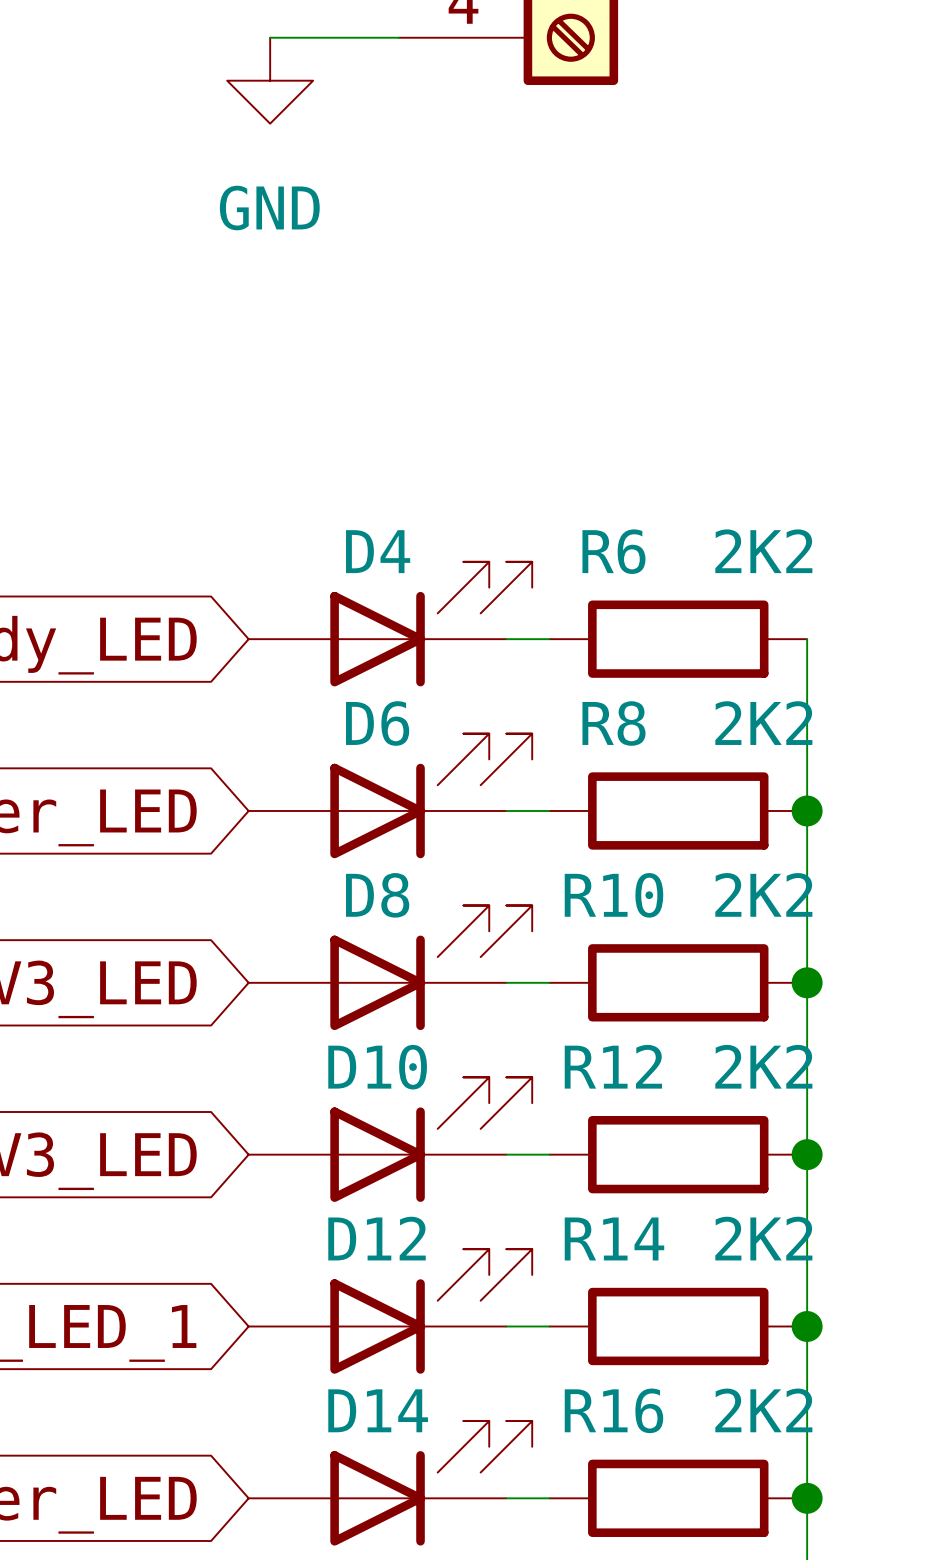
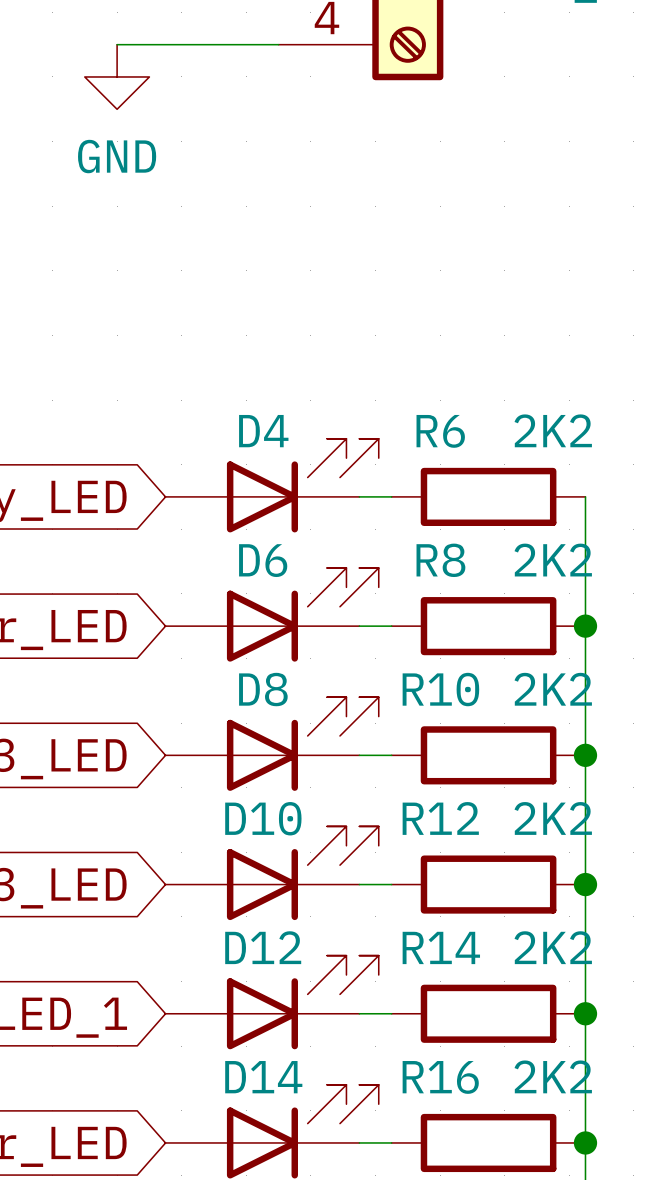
wire: none -> (117, 44) (181, 44)
power symbol position: GND (270, 80) -> GND (117, 76)
power symbol text position: GND (269, 208) -> GND (117, 156)

